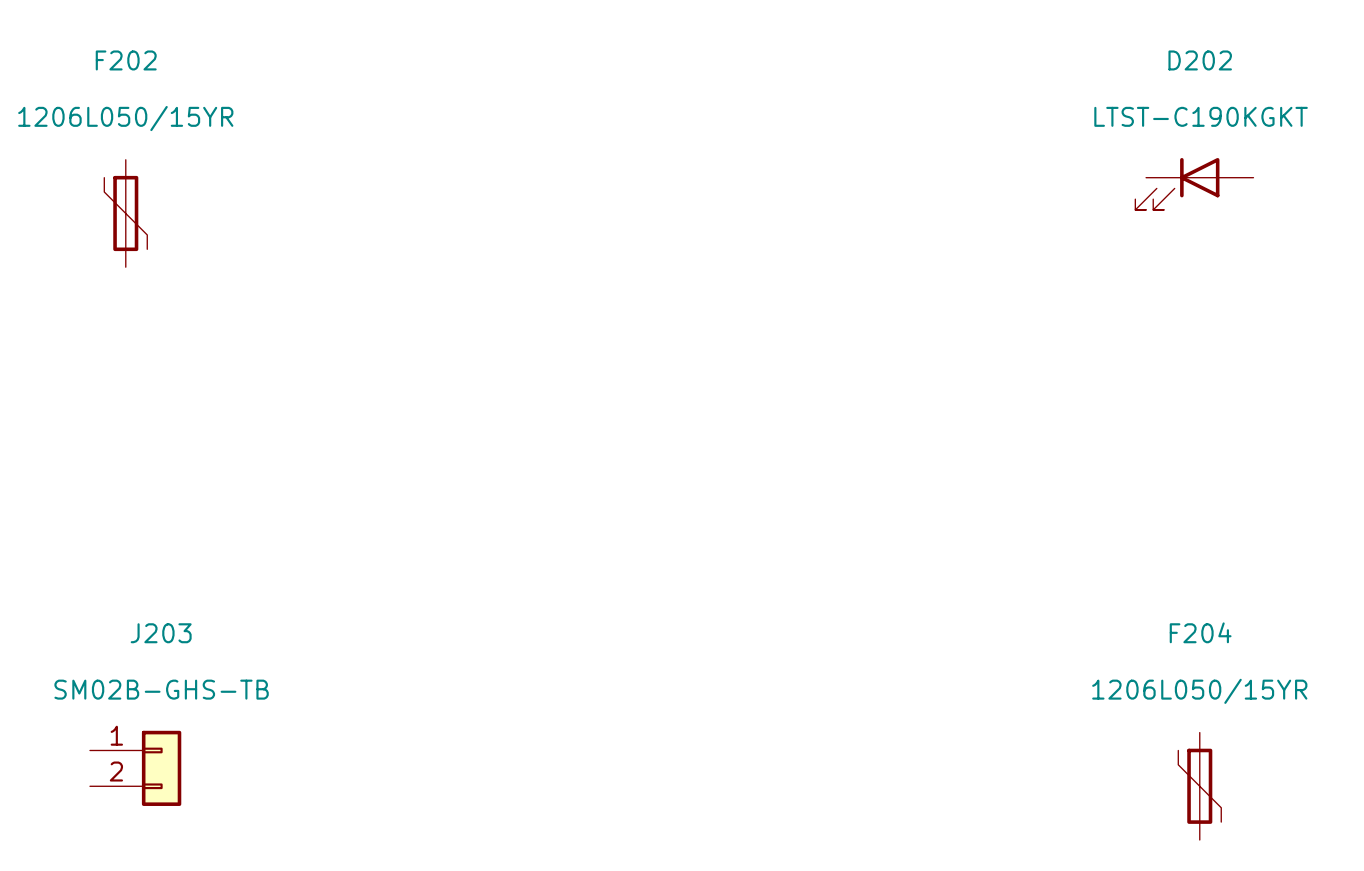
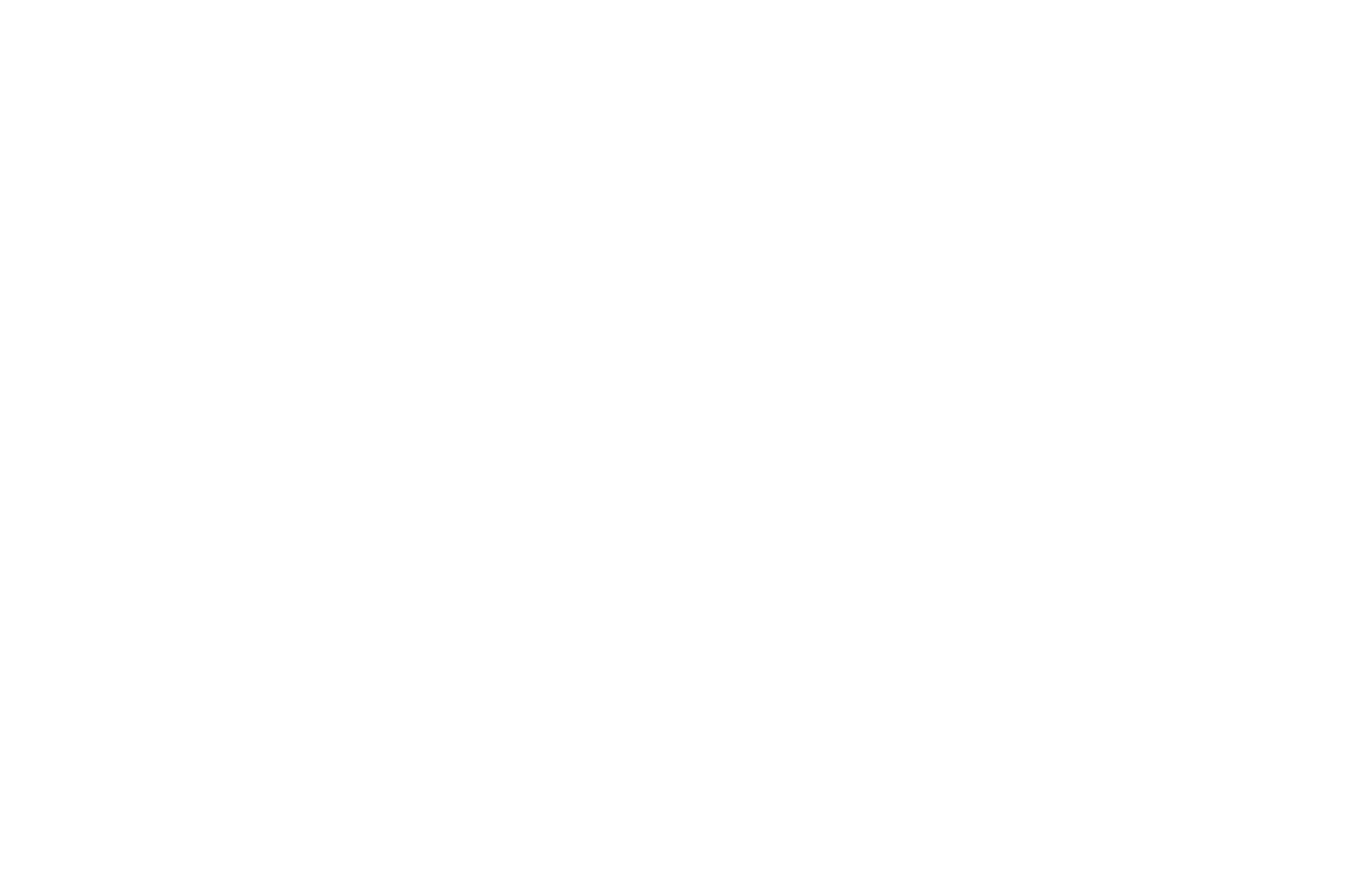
D202: LTST-C190KGKT (1194, 183) -> none
F202: 1206L050/15YR (125, 213) -> none
J203: SM02B-GHS-TB (135, 768) -> none
F204: 1206L050/15YR (1199, 786) -> none

